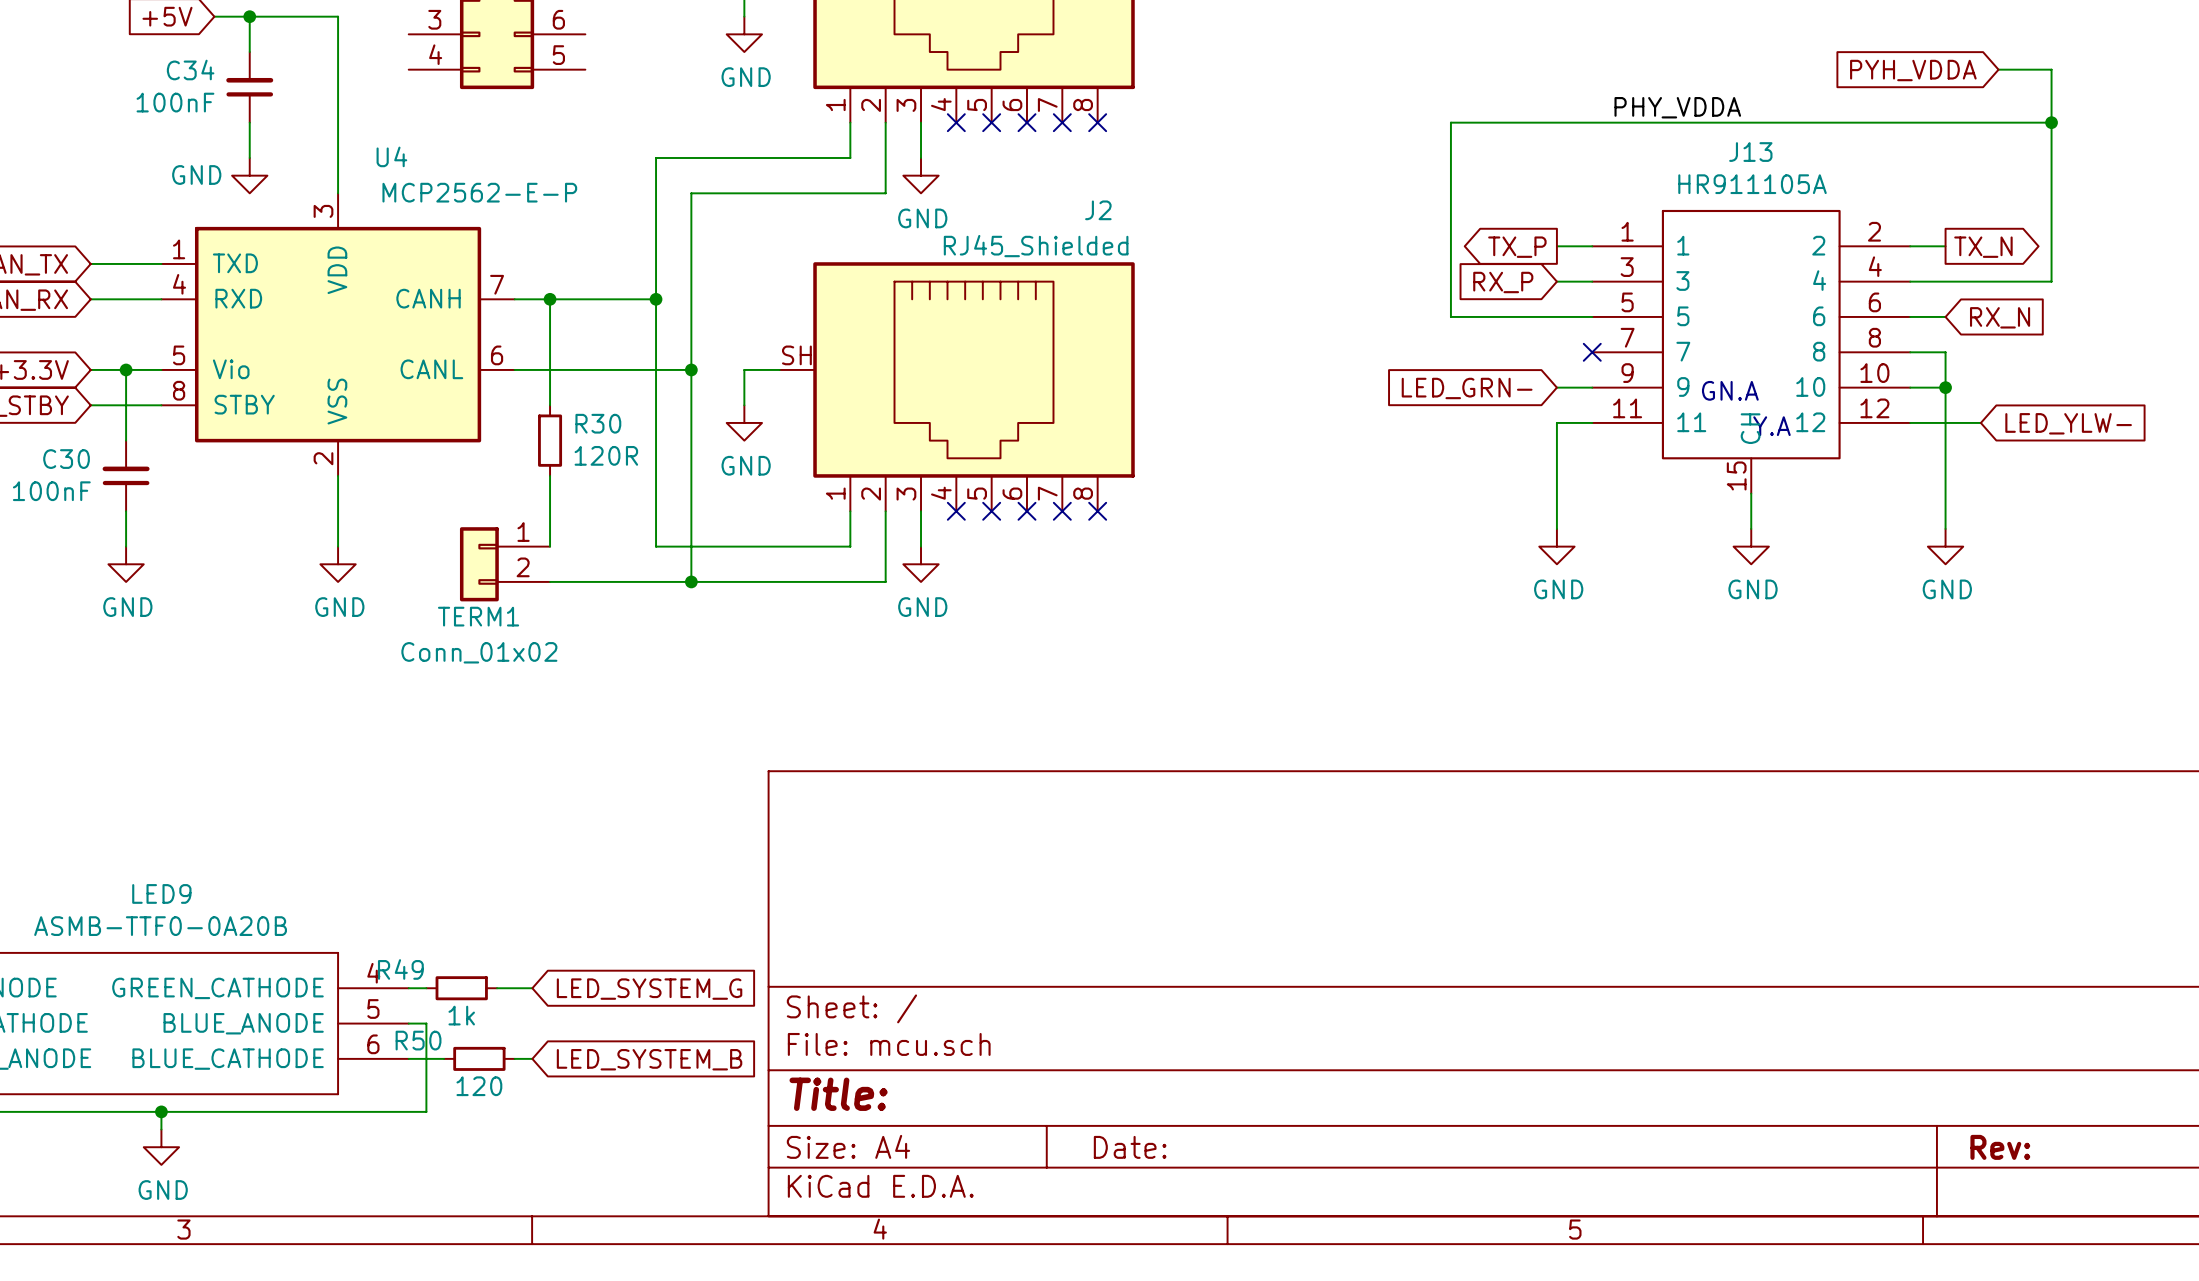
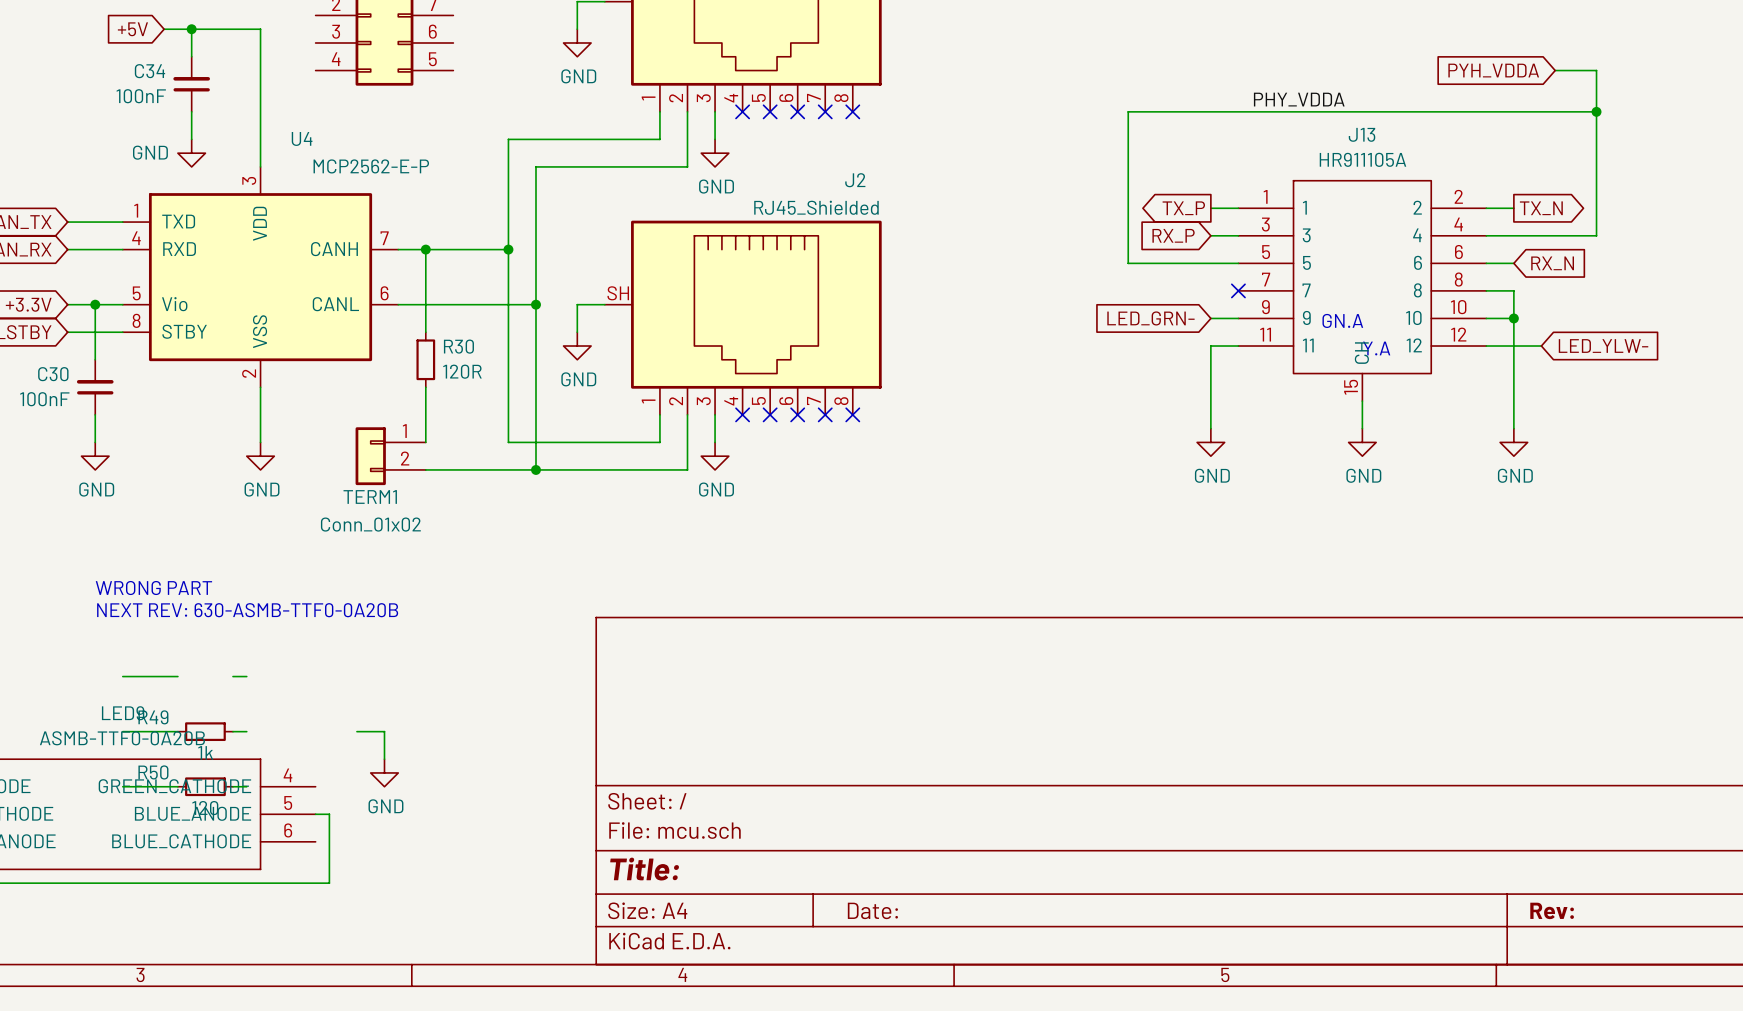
text: none -> WRONG PART (153, 588)
text: none -> NEXT REV: 630-ASMB-TTF0-0A20B (247, 610)
wire: none -> (122, 676) (177, 676)
wire: none -> (232, 676) (246, 676)
wire: none -> (122, 731) (177, 731)
wire: none -> (356, 731) (384, 731) (384, 759)
power symbol: none -> GND (384, 772)
wire: none -> (122, 786) (177, 786)
wire: (408, 988) (426, 988) -> (232, 786) (246, 786)
R49 position: (461, 988) -> (205, 731)
wire: (497, 988) (532, 988) -> none
global label: LED_SYSTEM_G (649, 989) -> none
wire: (408, 1058) (444, 1058) -> none
R50 position: (479, 1058) -> (205, 786)
wire: (514, 1058) (532, 1058) -> (232, 731) (246, 731)
global label: LED_SYSTEM_B (649, 1059) -> none
wire: (161, 1111) (161, 1129) -> none
junction: (161, 1111) -> none
power symbol: GND (161, 1147) -> none

